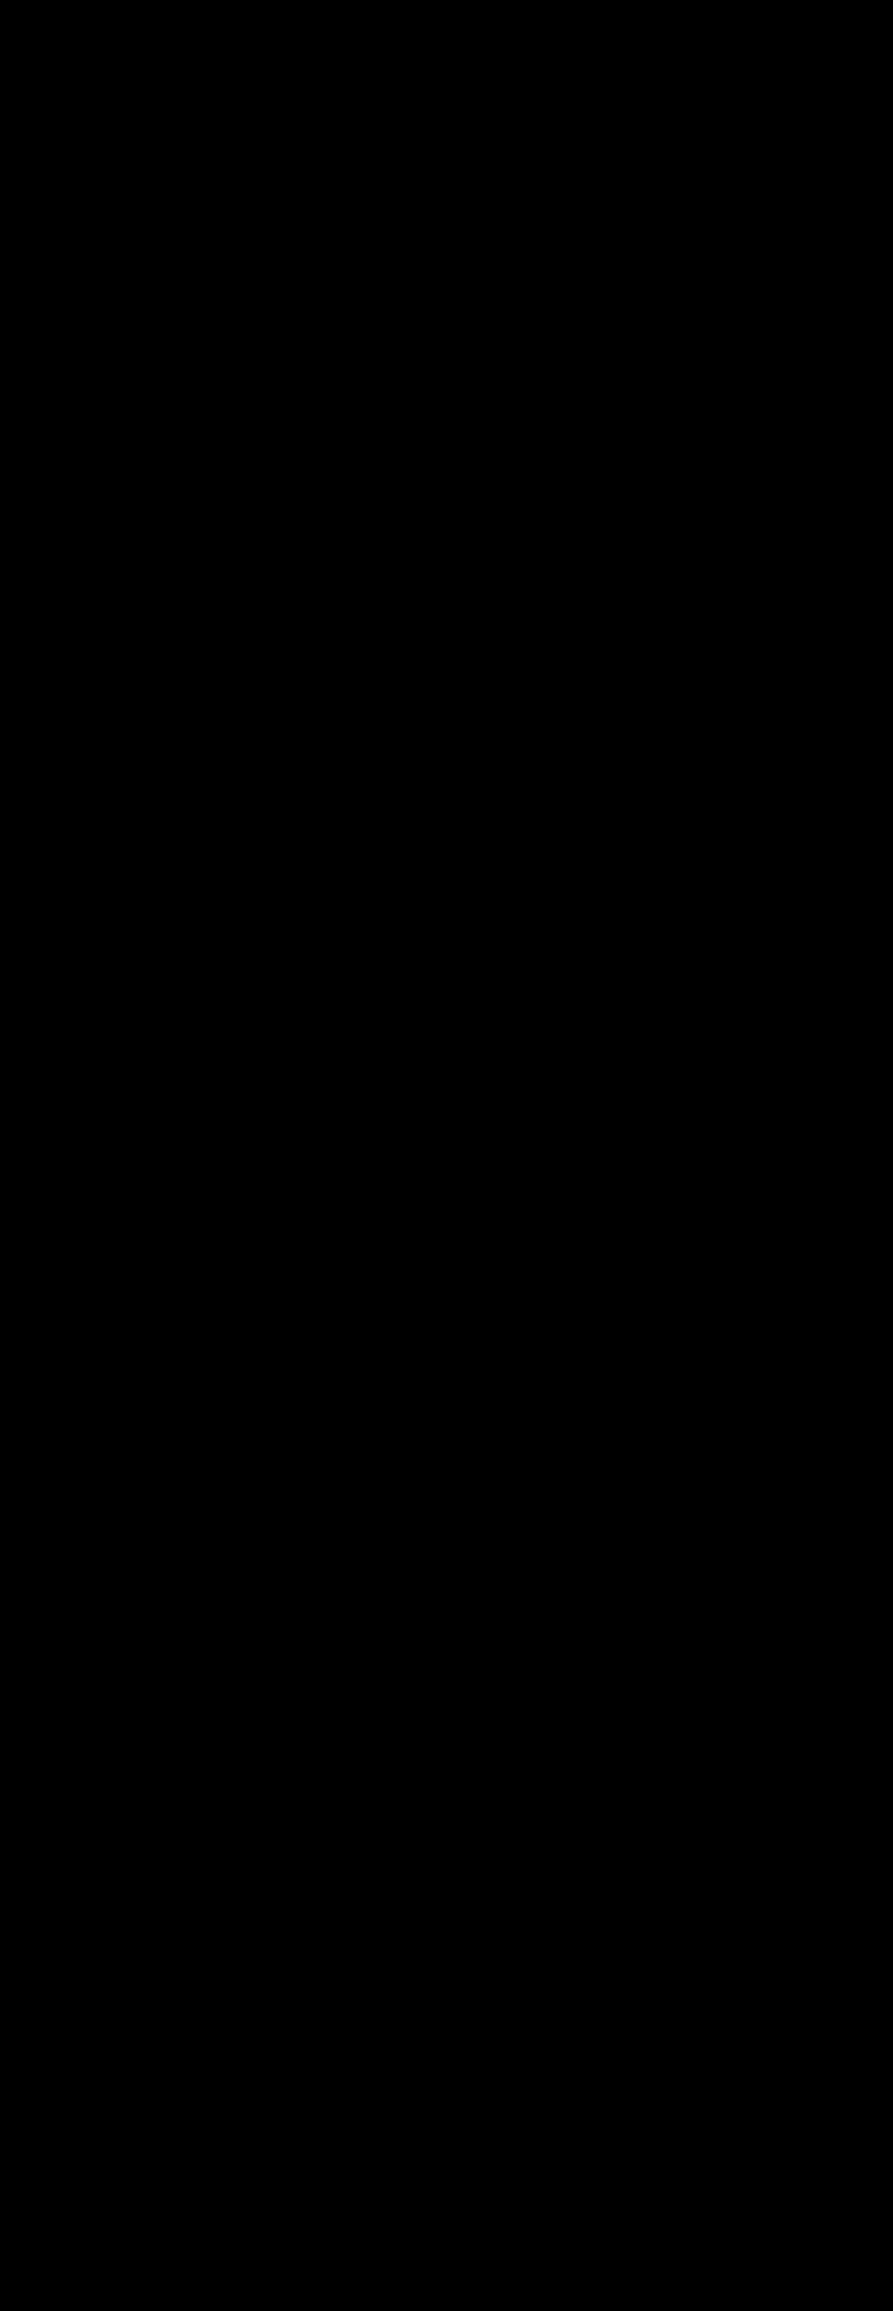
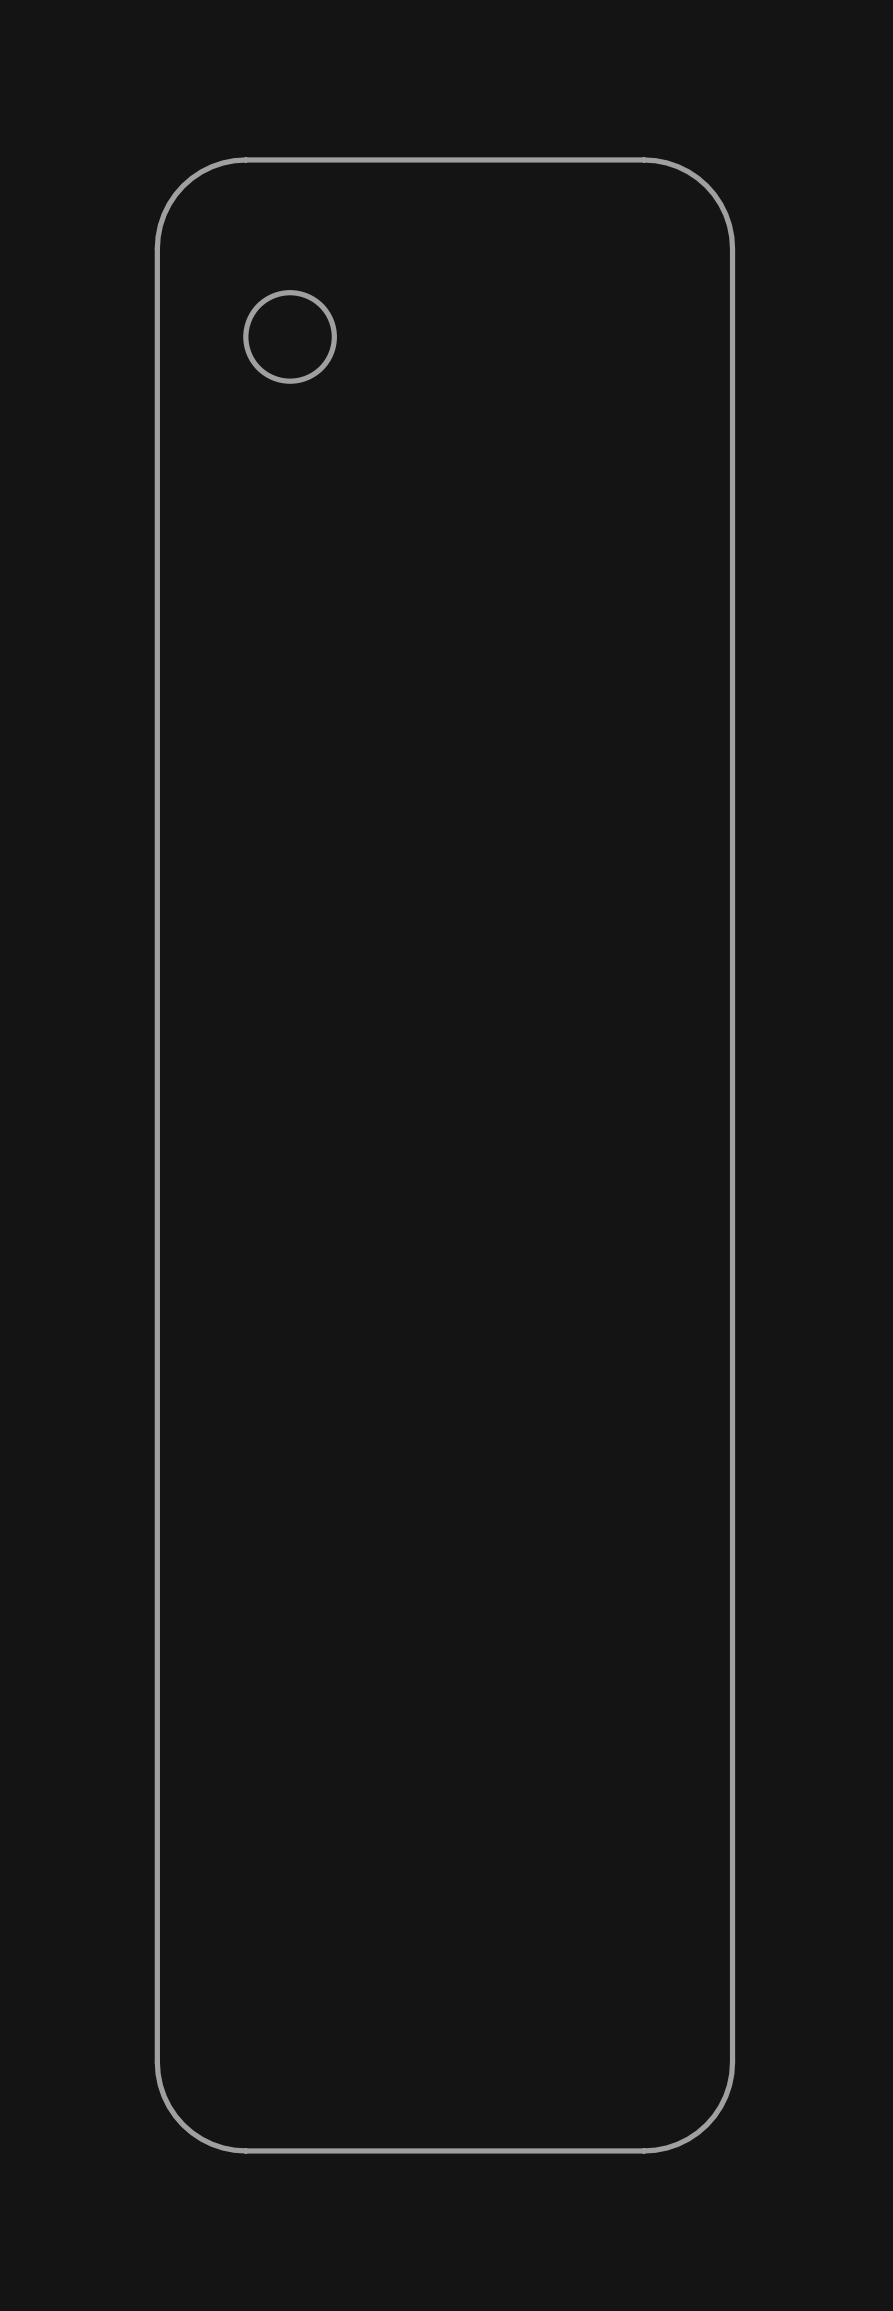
board edge: none -> (644, 159) (234, 160) (211, 166) (191, 178) (183, 185) (169, 204) (160, 225) (157, 248) (157, 2062) (158, 2074) (164, 2096) (175, 2116) (191, 2132) (201, 2139) (222, 2147) (245, 2150) (655, 2150) (677, 2144) (697, 2132) (714, 2116) (720, 2106) (729, 2085) (732, 2062) (732, 248) (731, 236) (725, 214) (720, 204) (706, 185) (688, 171) (677, 166) (666, 162) (644, 159)
round board edge: none -> [243, 290, 337, 384]

